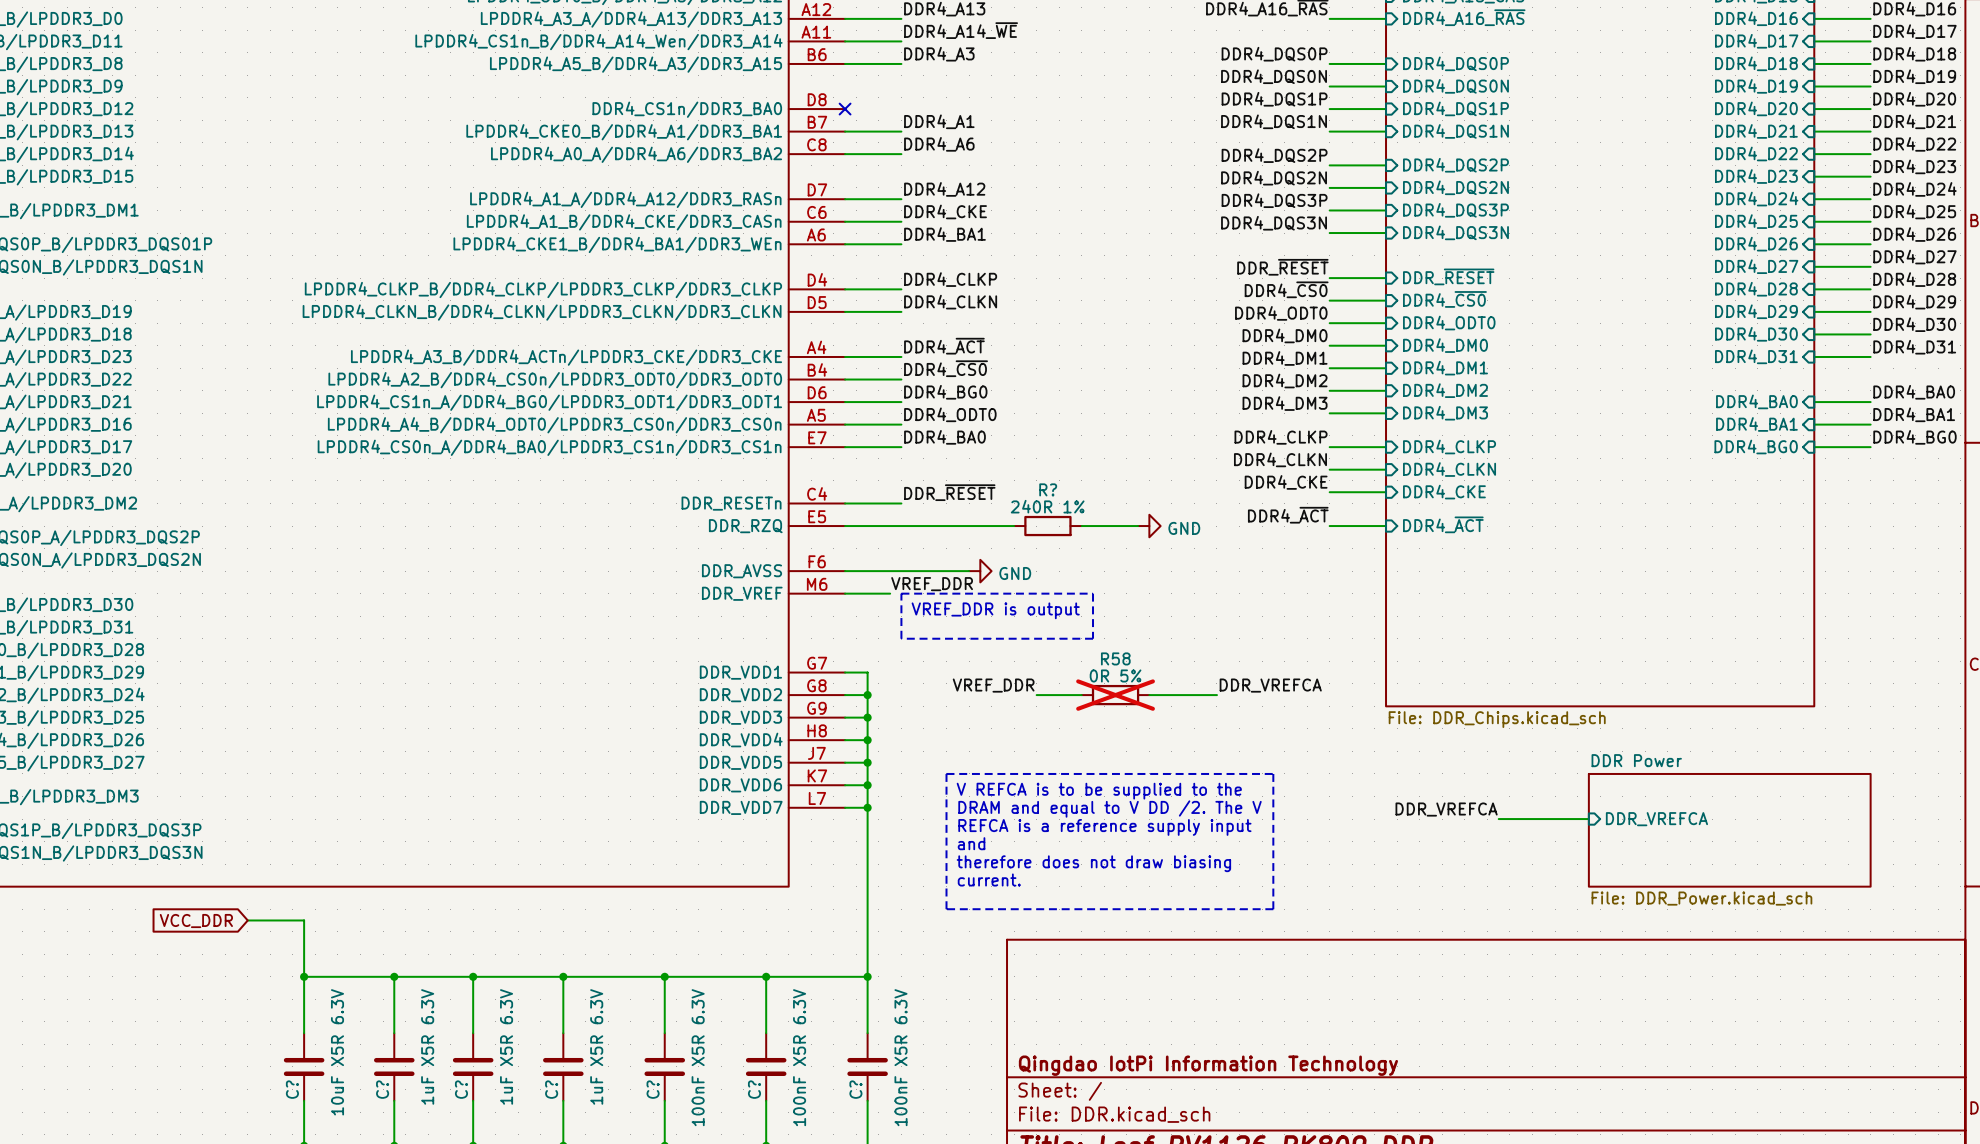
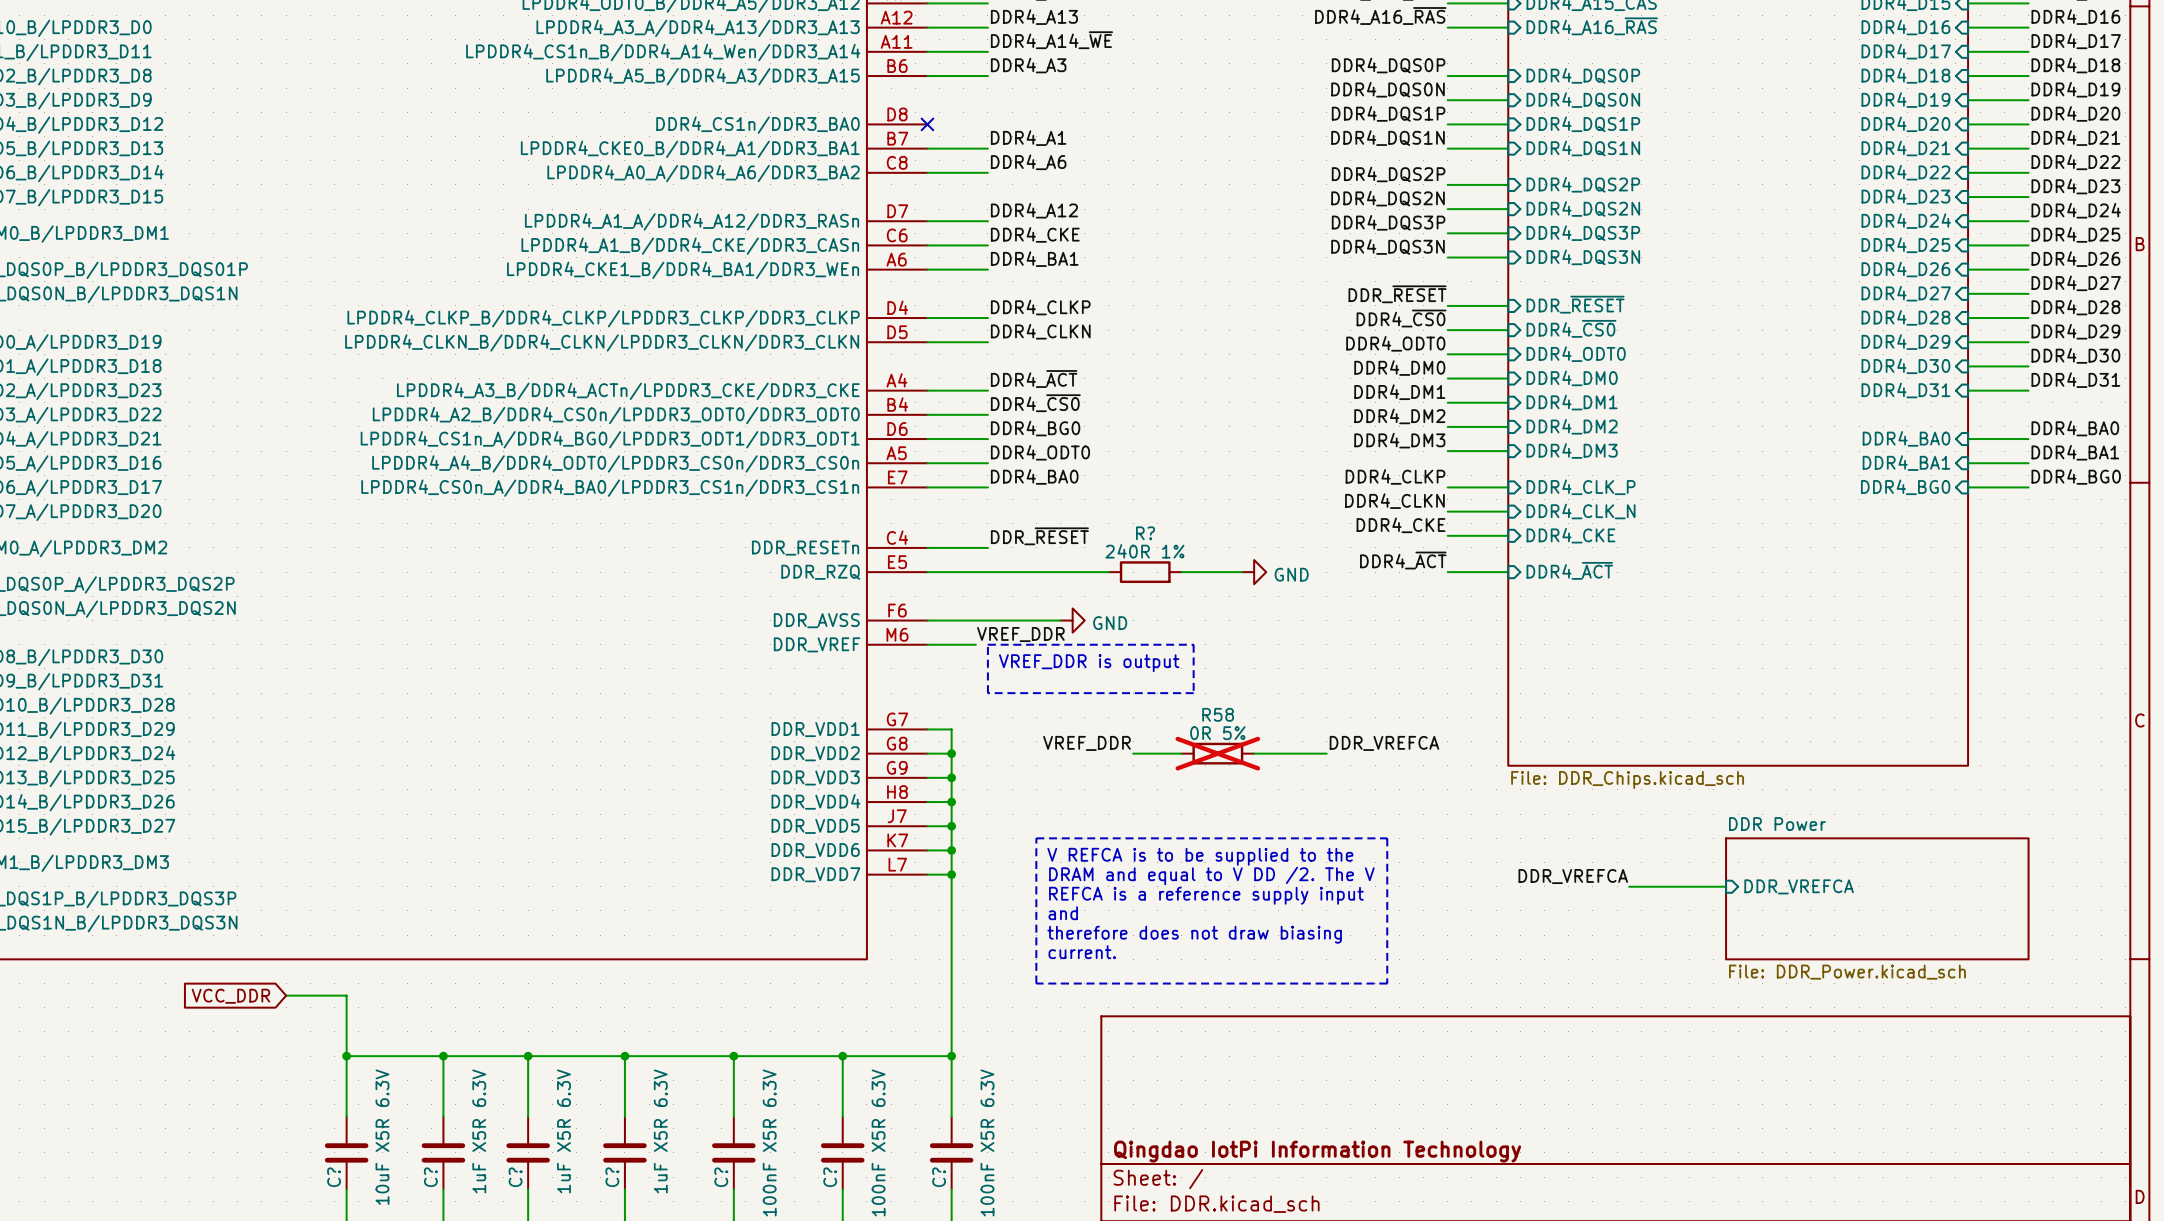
sheet pin: DDR4_CLKP (1449, 446) -> DDR4_CLK_P (1581, 487)
sheet pin: DDR4_CLKN (1449, 469) -> DDR4_CLK_N (1581, 511)

